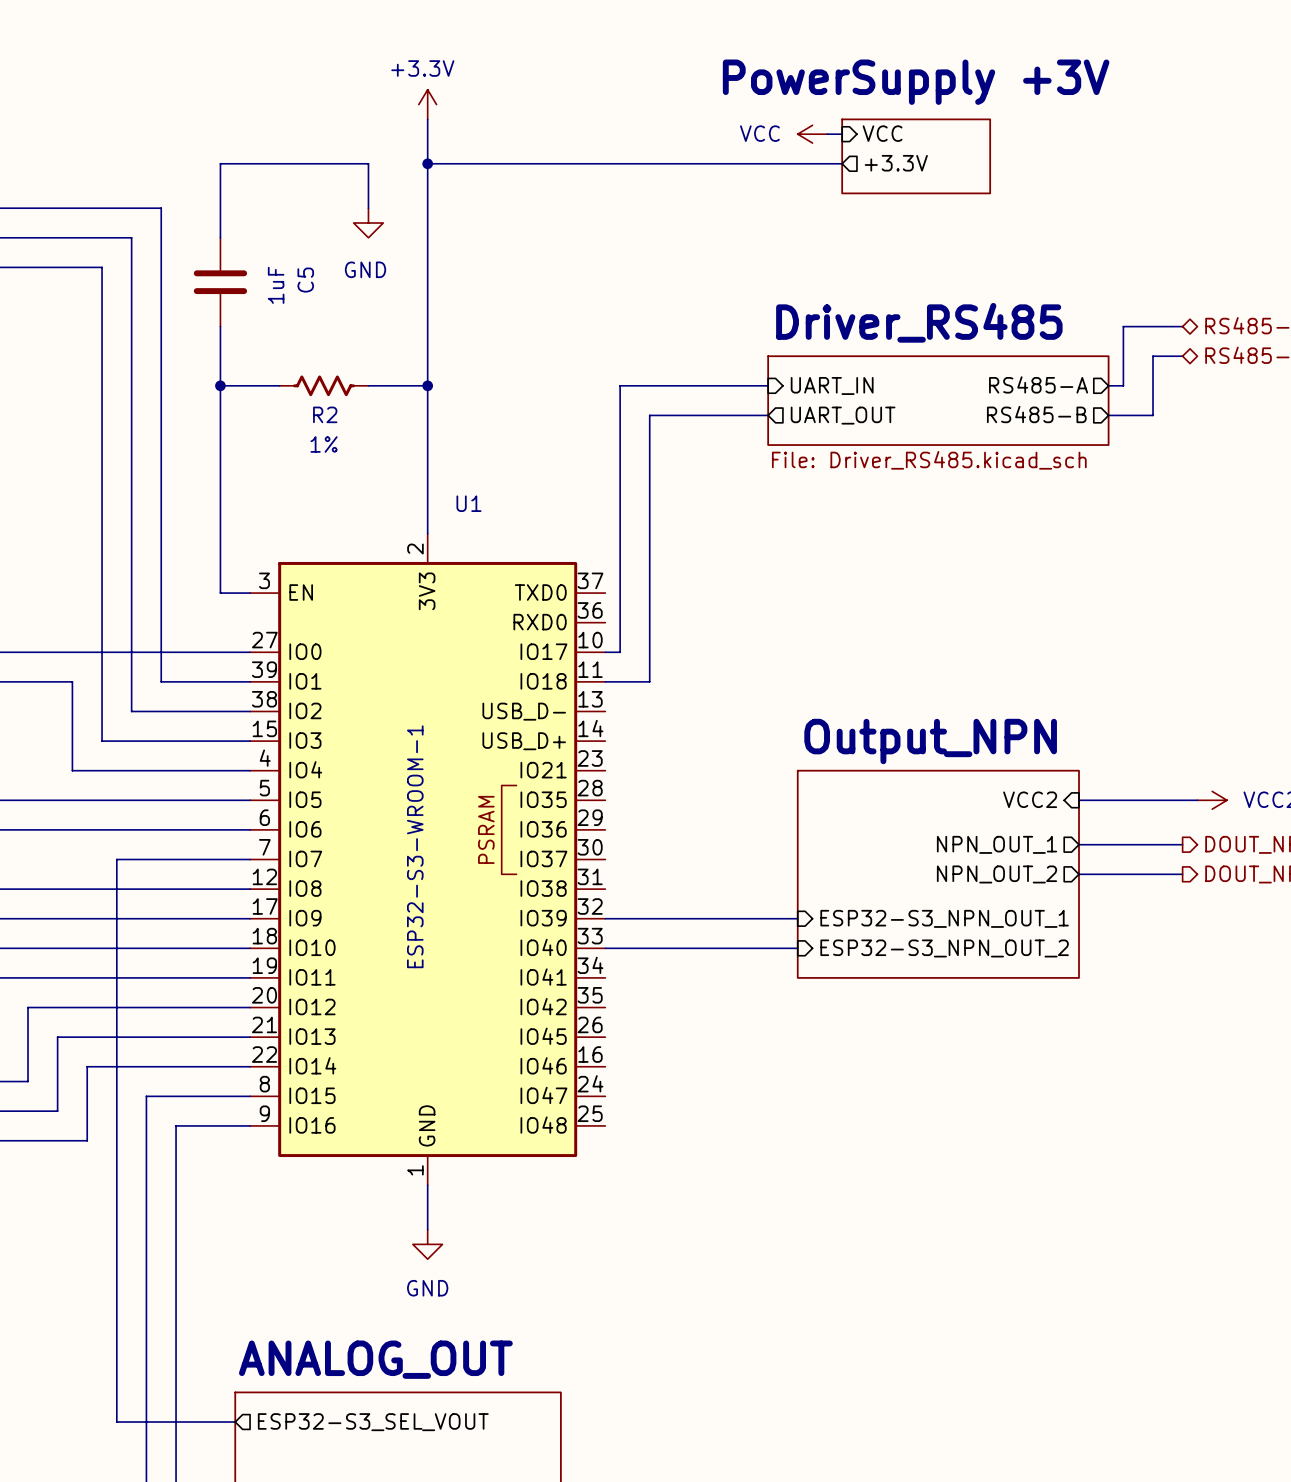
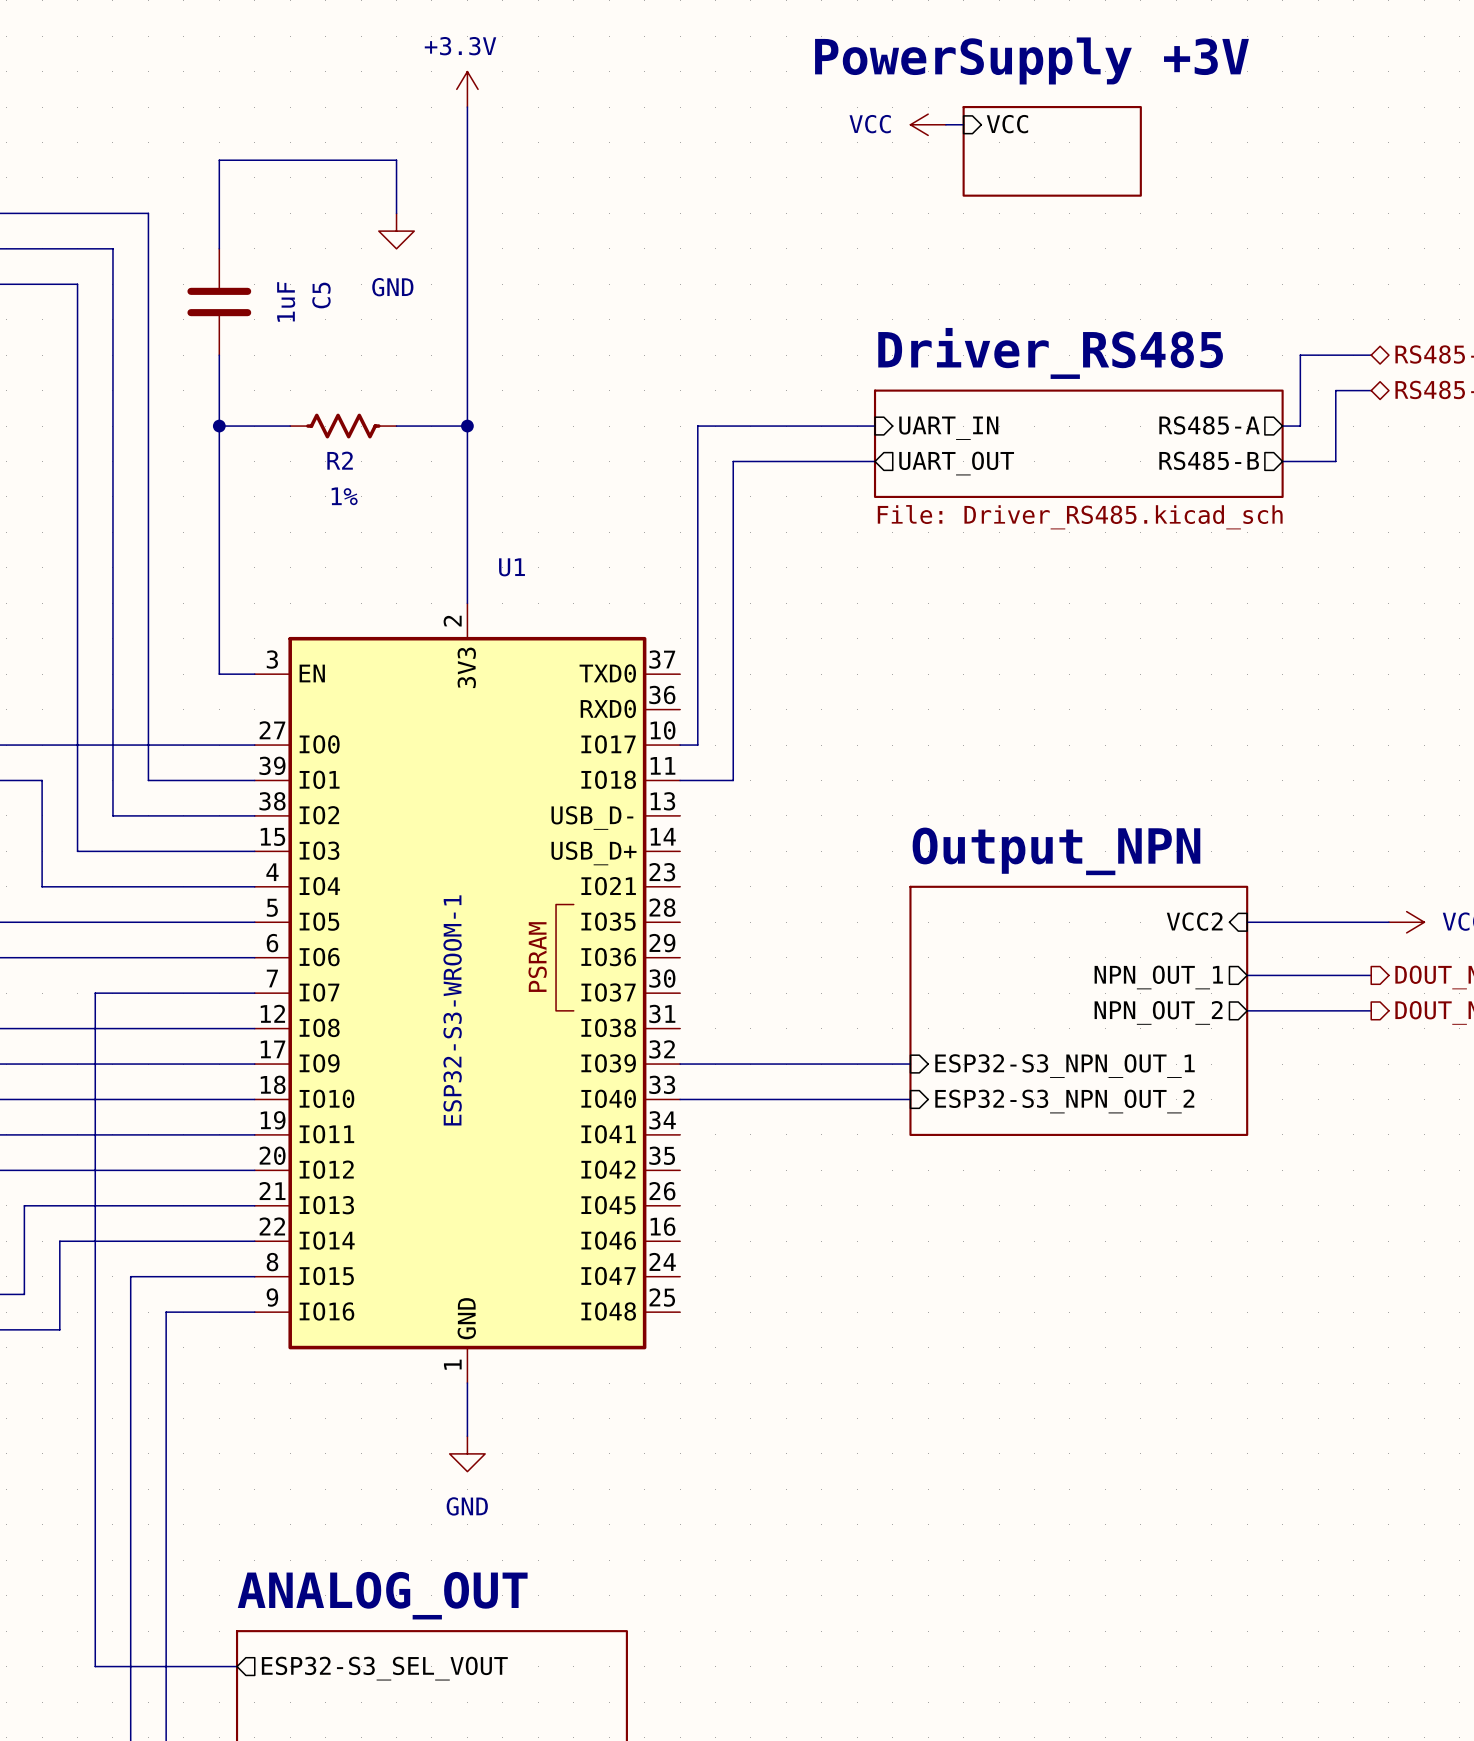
wire: (427, 163) (842, 163) -> none
junction: (427, 163) -> none
sheet pin: +3.3V (896, 163) -> none

